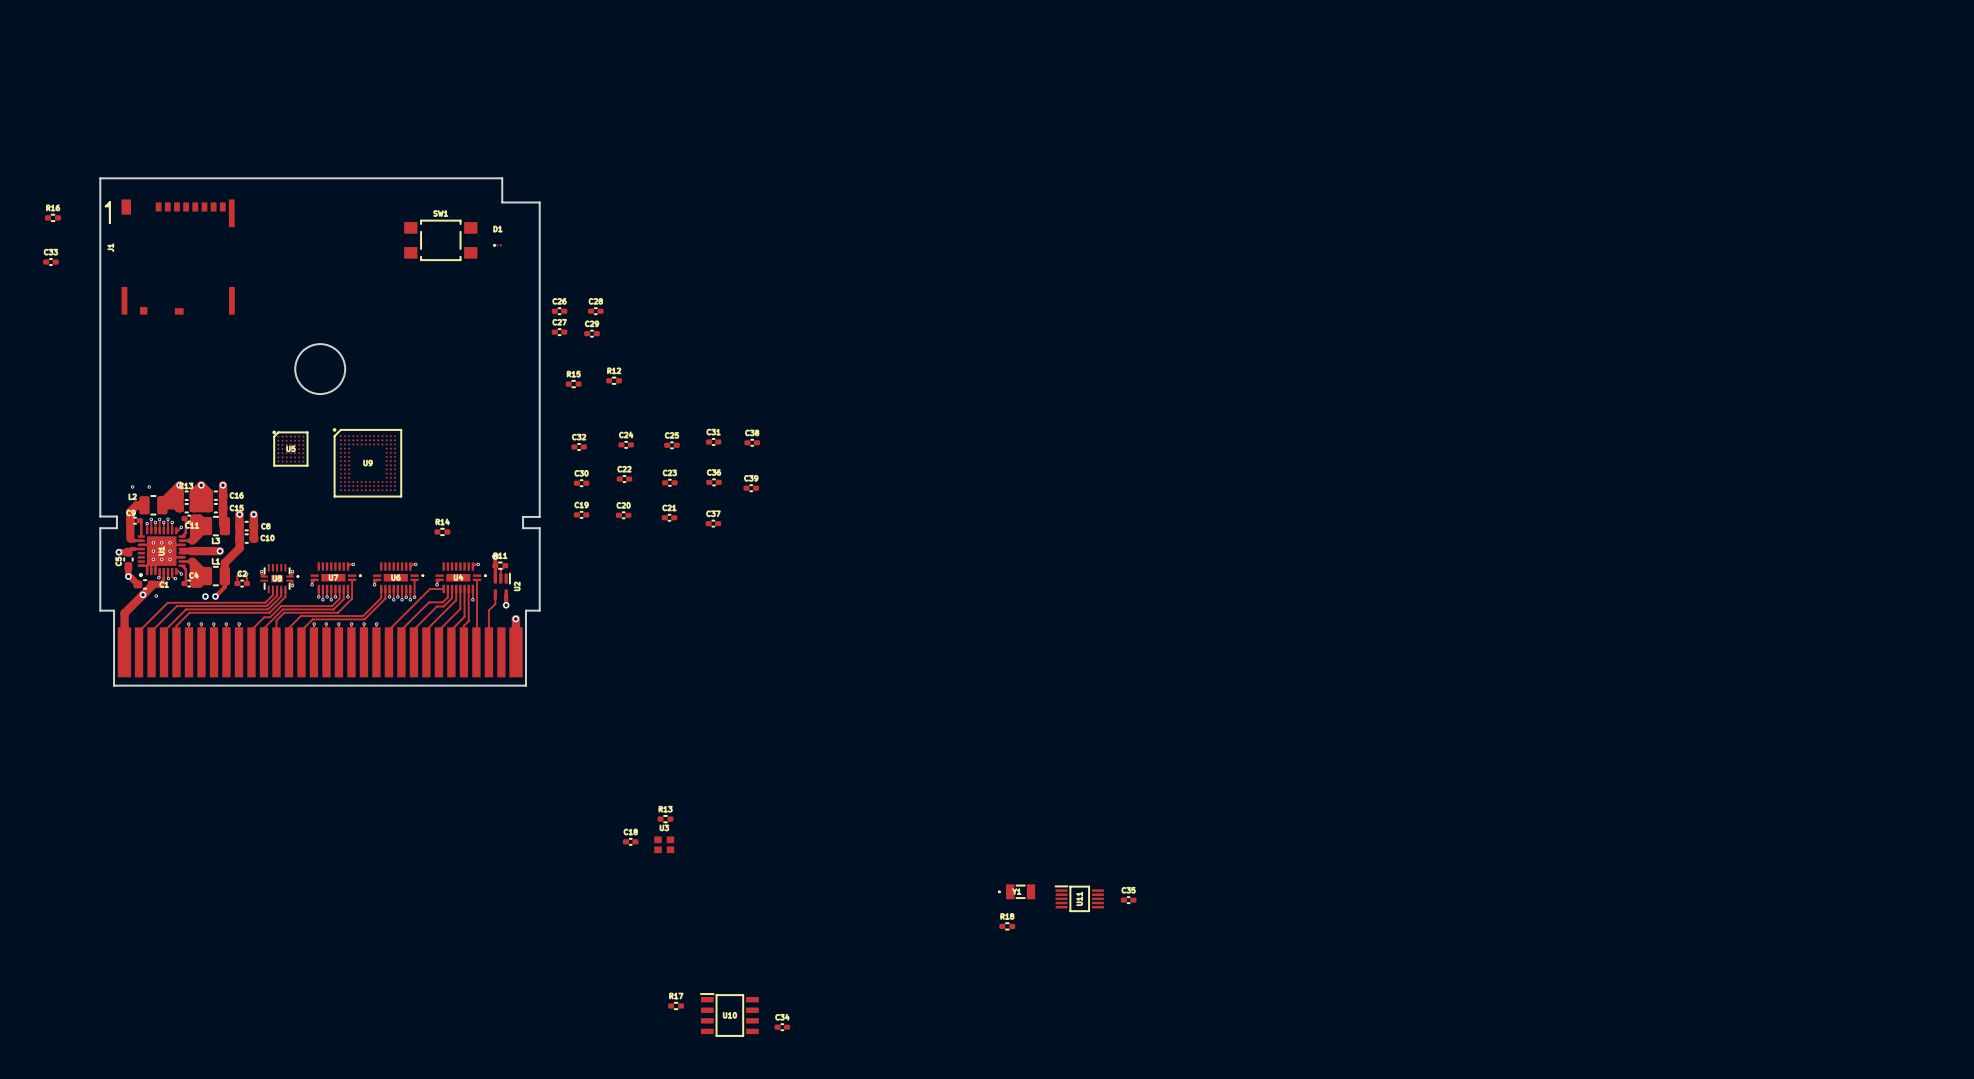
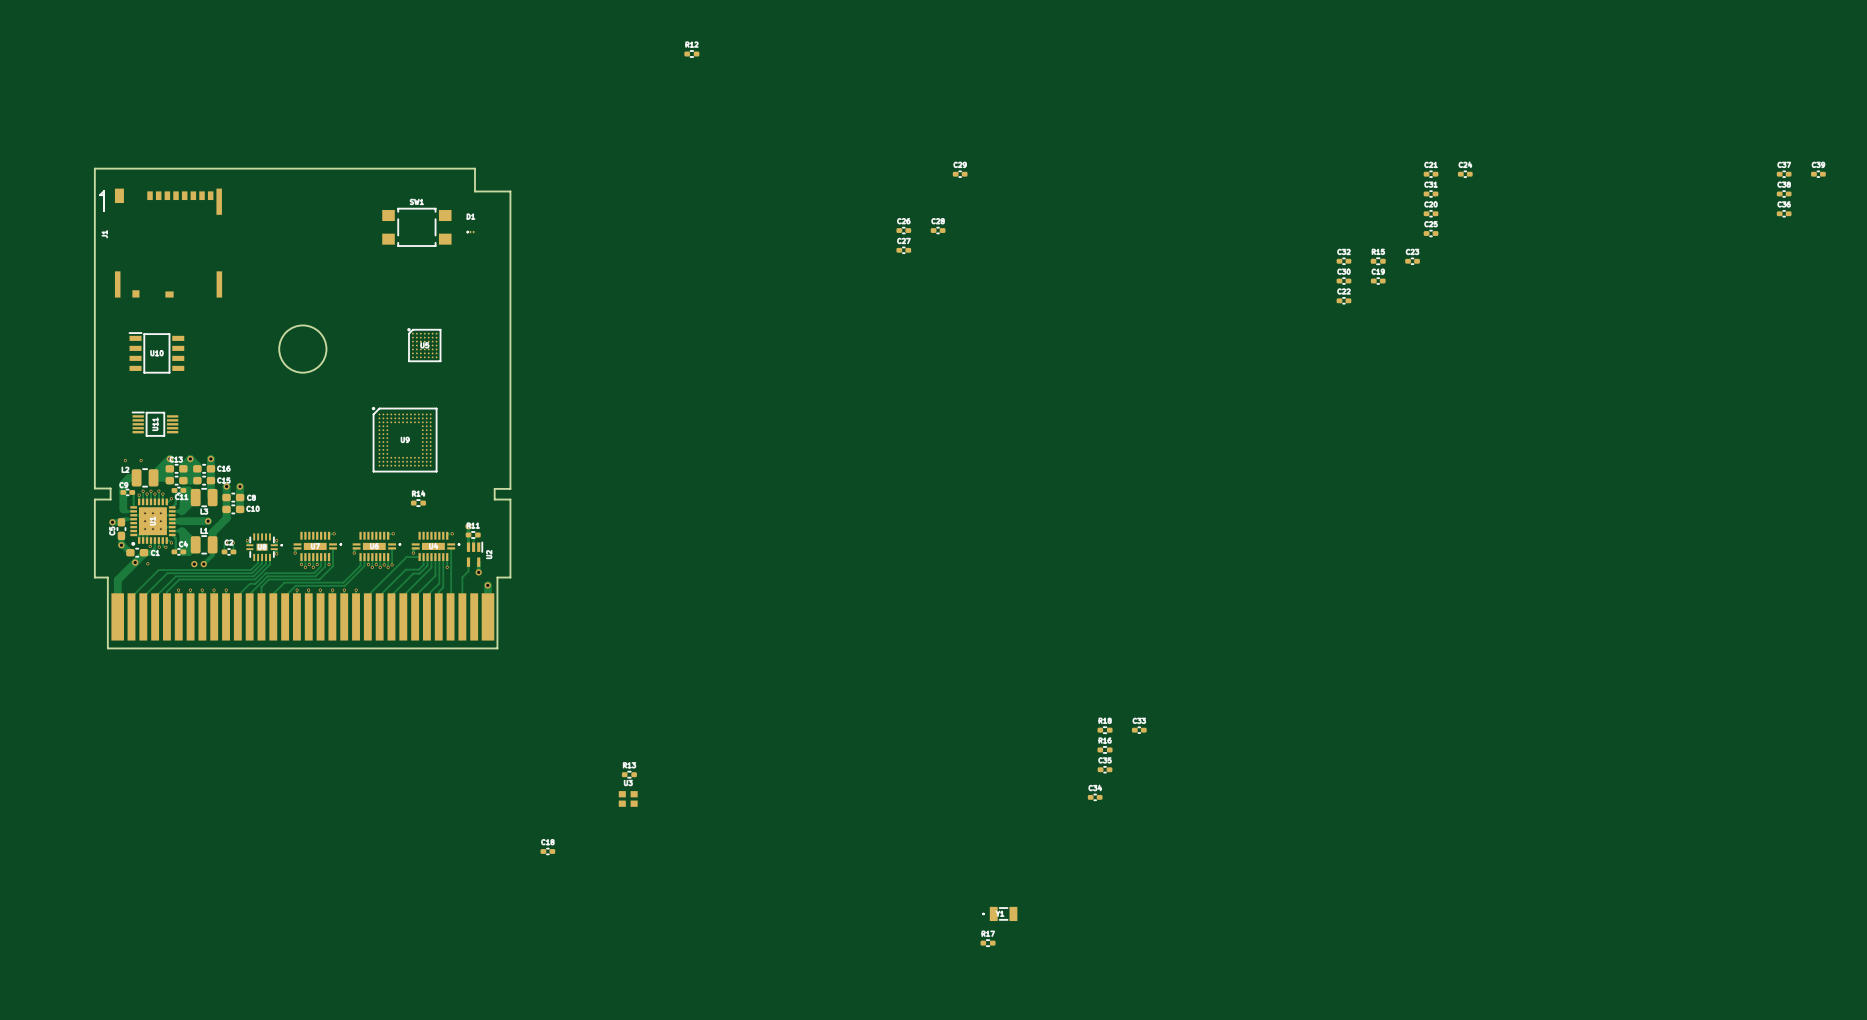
part position: (53, 217) -> (1105, 749)
part position: (50, 262) -> (1139, 730)
part position: (559, 311) -> (903, 230)
part position: (595, 311) -> (938, 230)
part position: (559, 332) -> (903, 250)
part position: (591, 333) -> (960, 174)
part position: (614, 380) -> (691, 54)
part position: (573, 384) -> (1378, 261)
part position: (713, 441) -> (1431, 193)
part position: (752, 442) -> (1784, 193)
part position: (626, 444) -> (1465, 174)
part position: (671, 445) -> (1431, 233)
part position: (579, 446) -> (1343, 261)
part position: (290, 448) -> (424, 345)
part position: (367, 462) -> (404, 439)
part position: (624, 479) -> (1343, 300)
part position: (669, 482) -> (1412, 261)
part position: (714, 482) -> (1784, 213)
part position: (581, 483) -> (1343, 281)
part position: (751, 488) -> (1818, 174)
part position: (581, 514) -> (1378, 281)
part position: (623, 515) -> (1431, 213)
part position: (669, 517) -> (1431, 174)
part position: (713, 523) -> (1784, 174)
part position: (630, 841) -> (547, 851)
part position: (1016, 891) -> (999, 913)
part position: (1079, 898) -> (155, 424)
part position: (1128, 900) -> (1105, 769)
part position: (1007, 926) -> (1105, 730)
part position: (676, 1005) -> (988, 943)
part position: (729, 1014) -> (156, 352)
part position: (782, 1027) -> (1095, 797)

